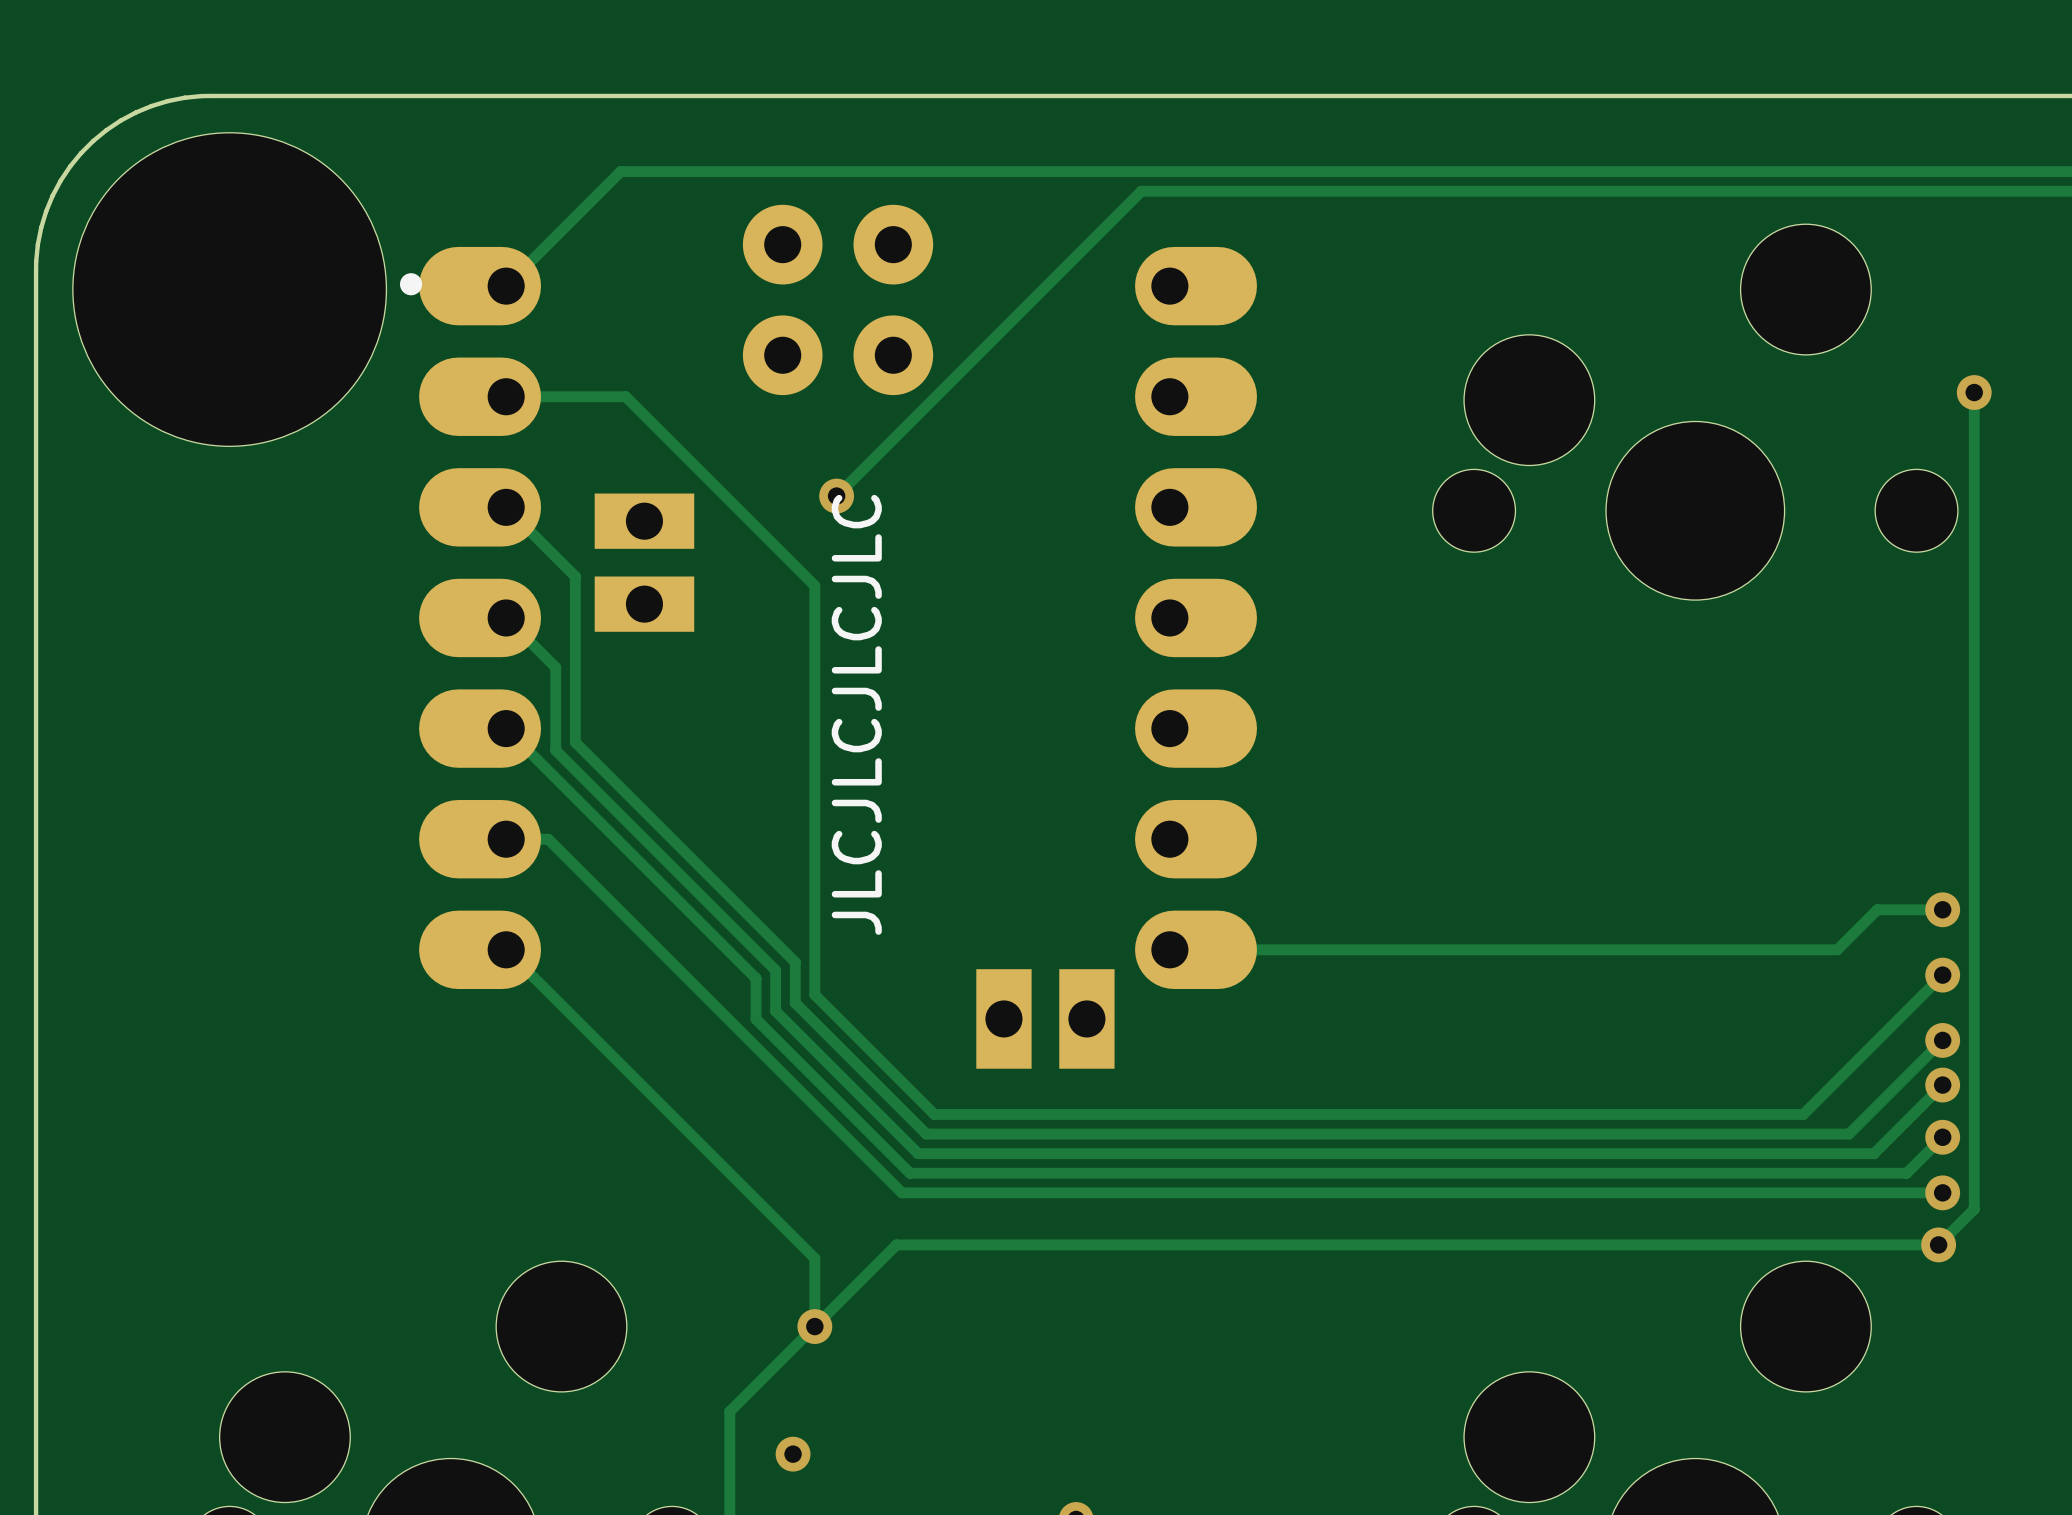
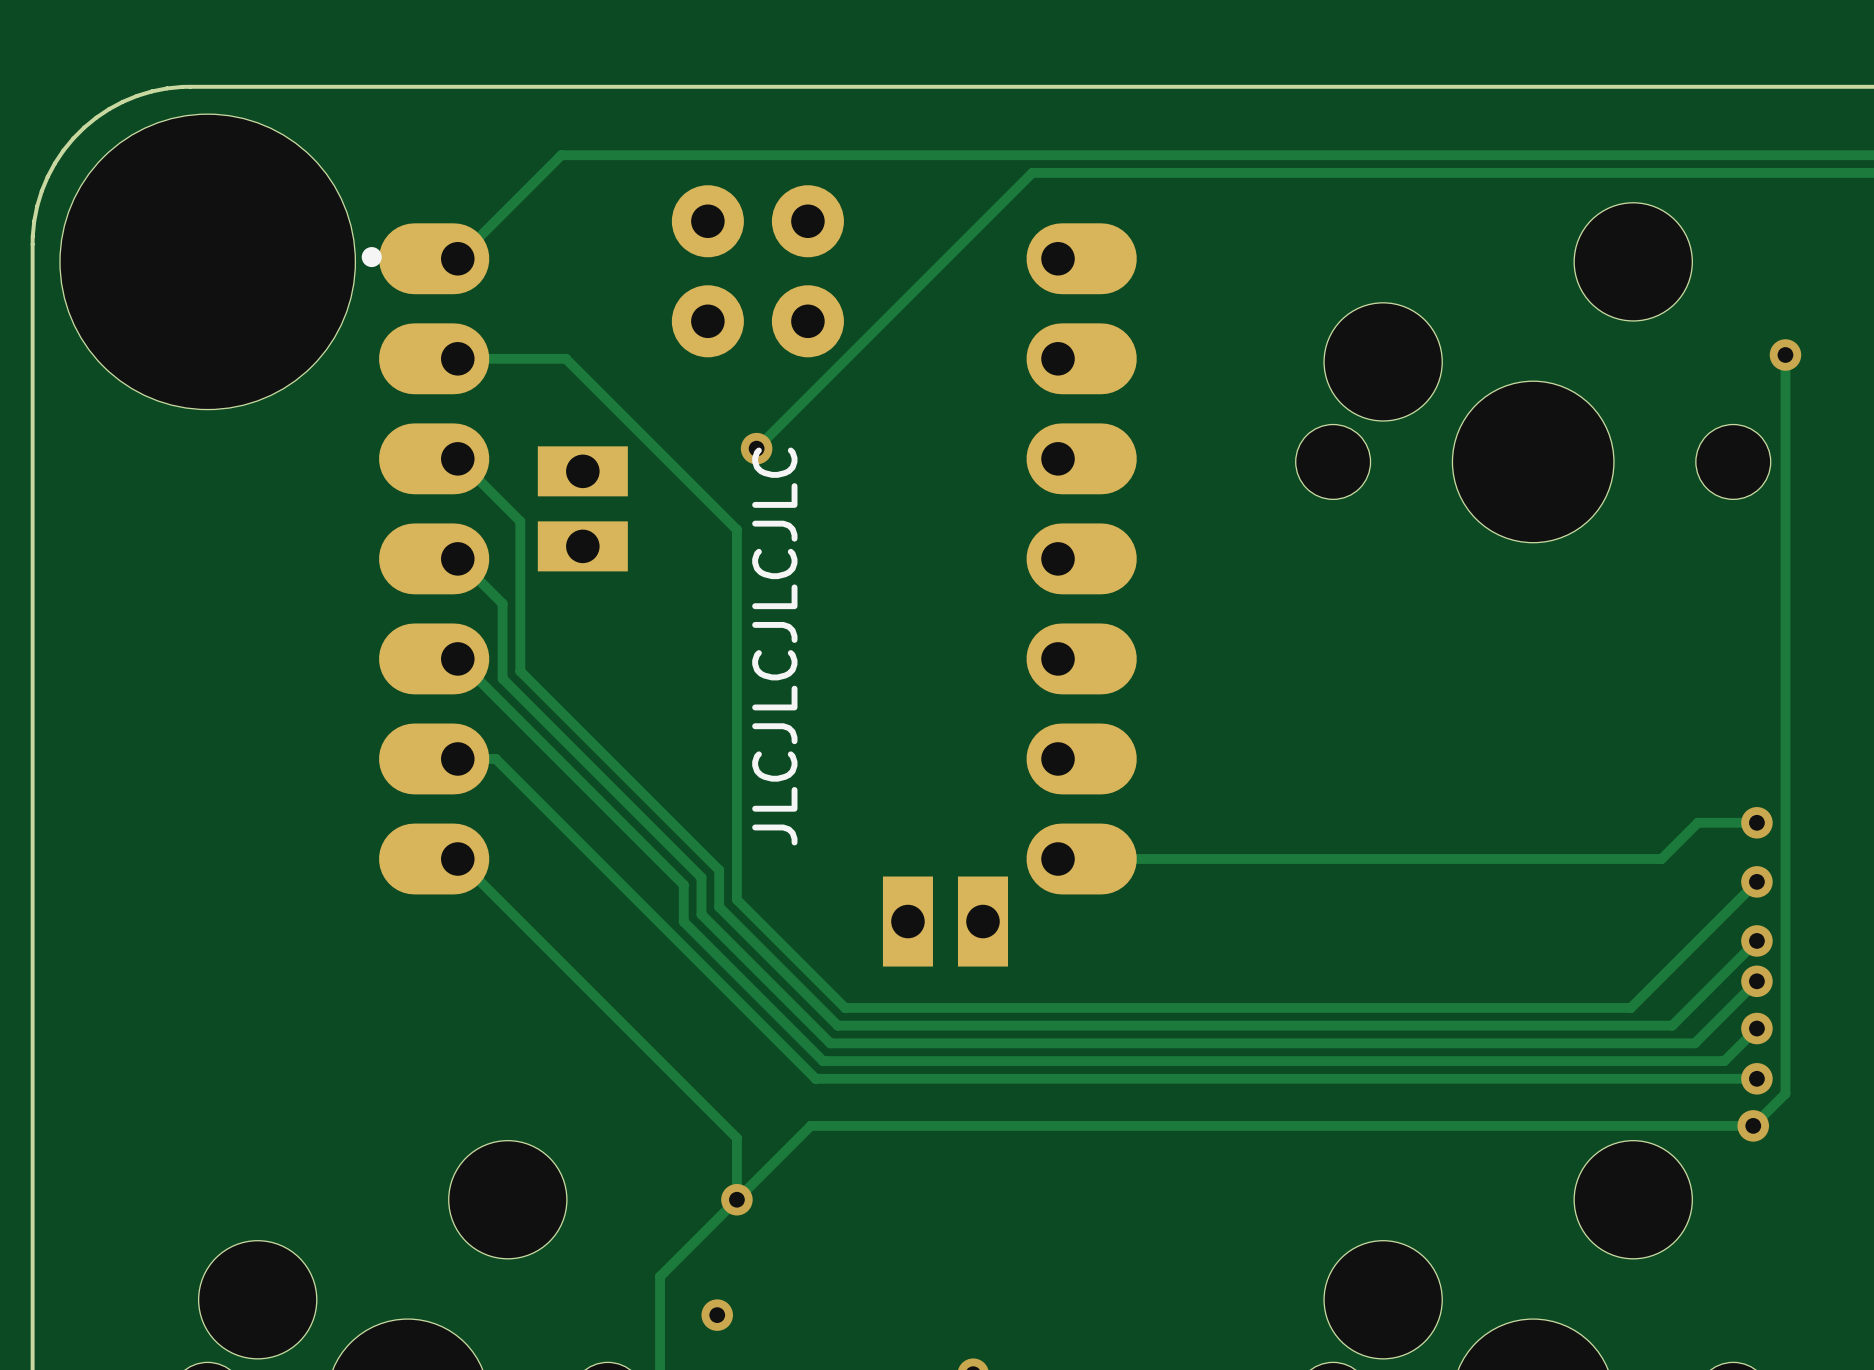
part footprint: [72, 132, 387, 447] -> [59, 114, 356, 410]

